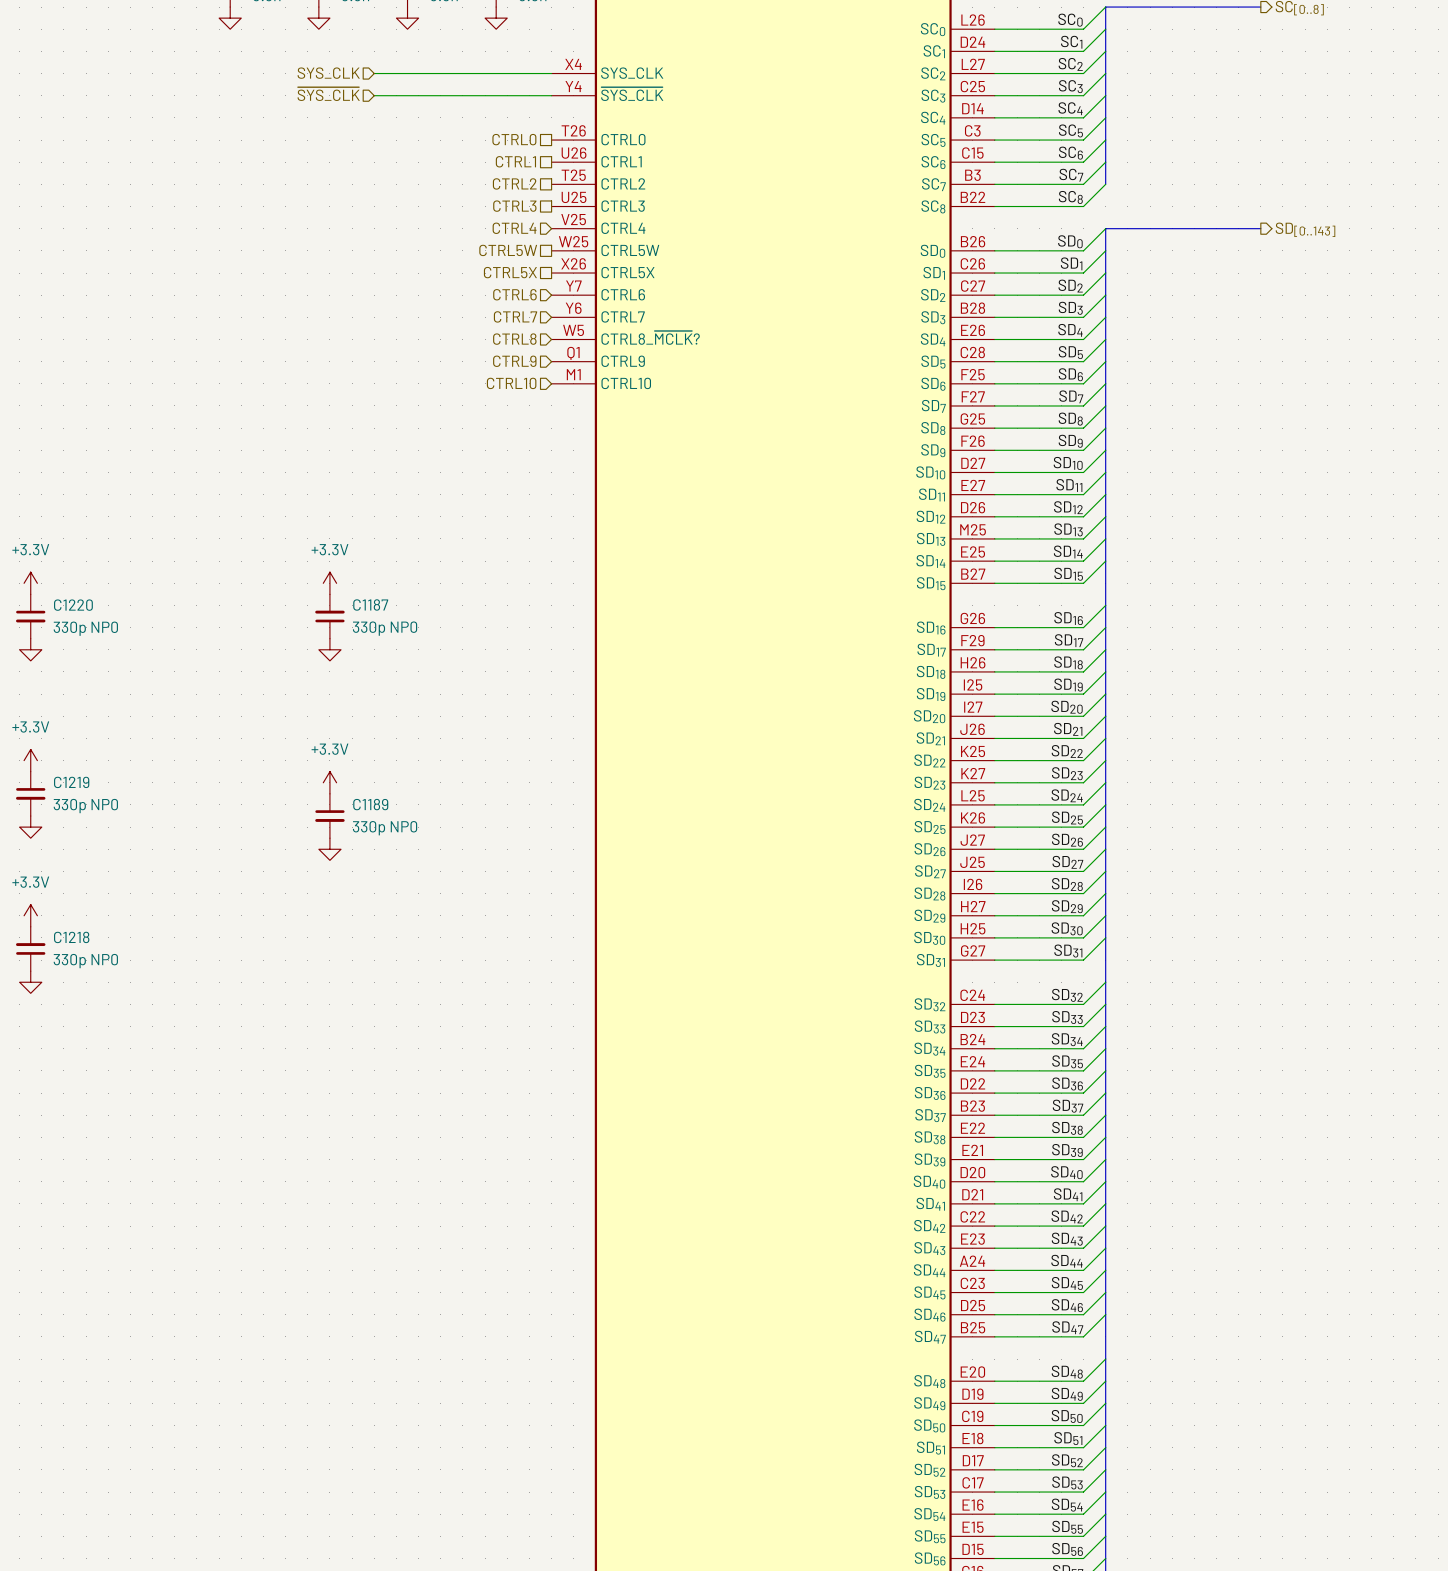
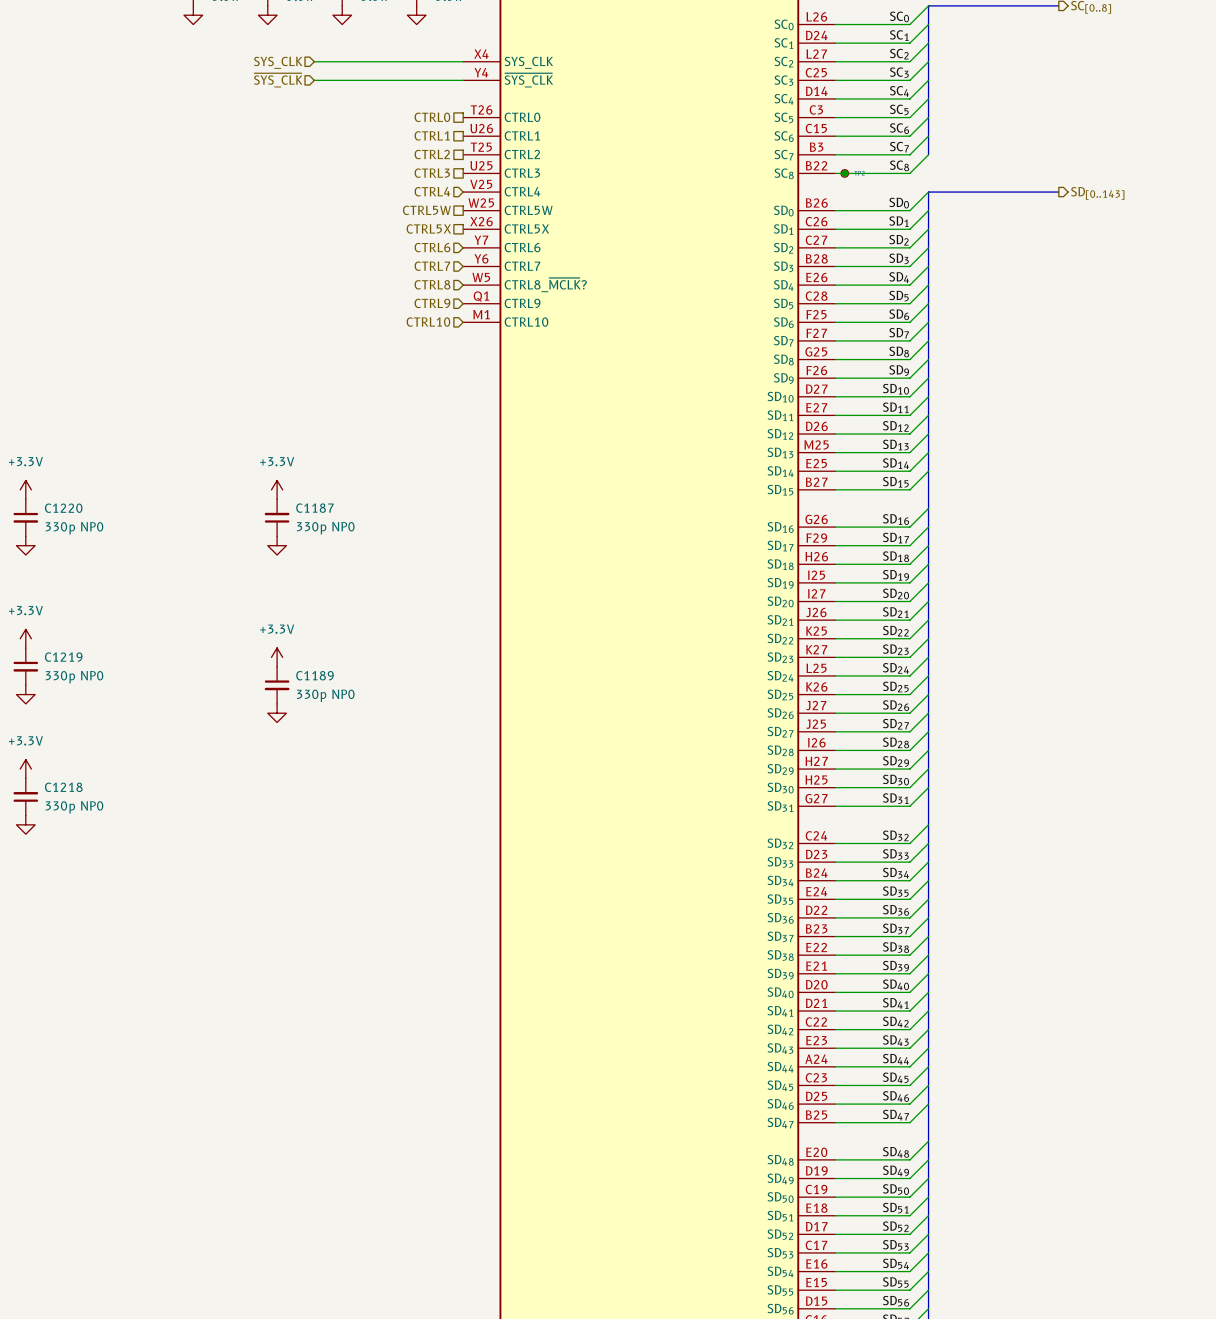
junction: none -> (844, 173)
part: none -> (844, 173)

